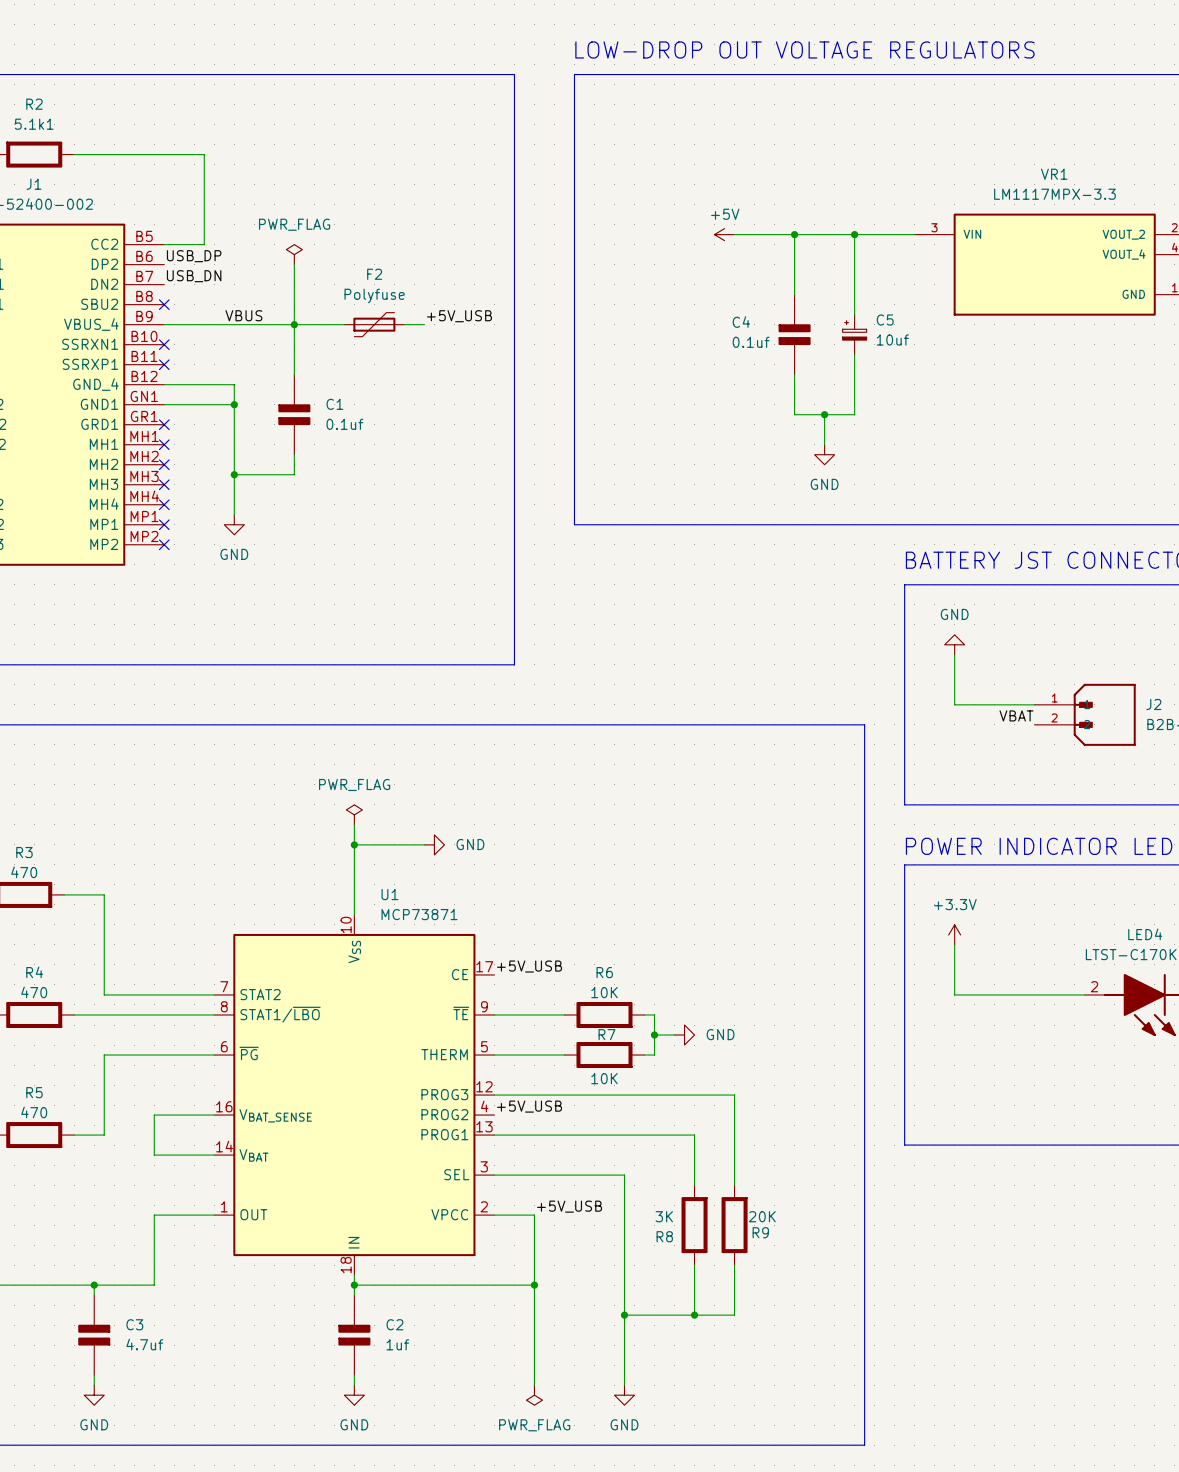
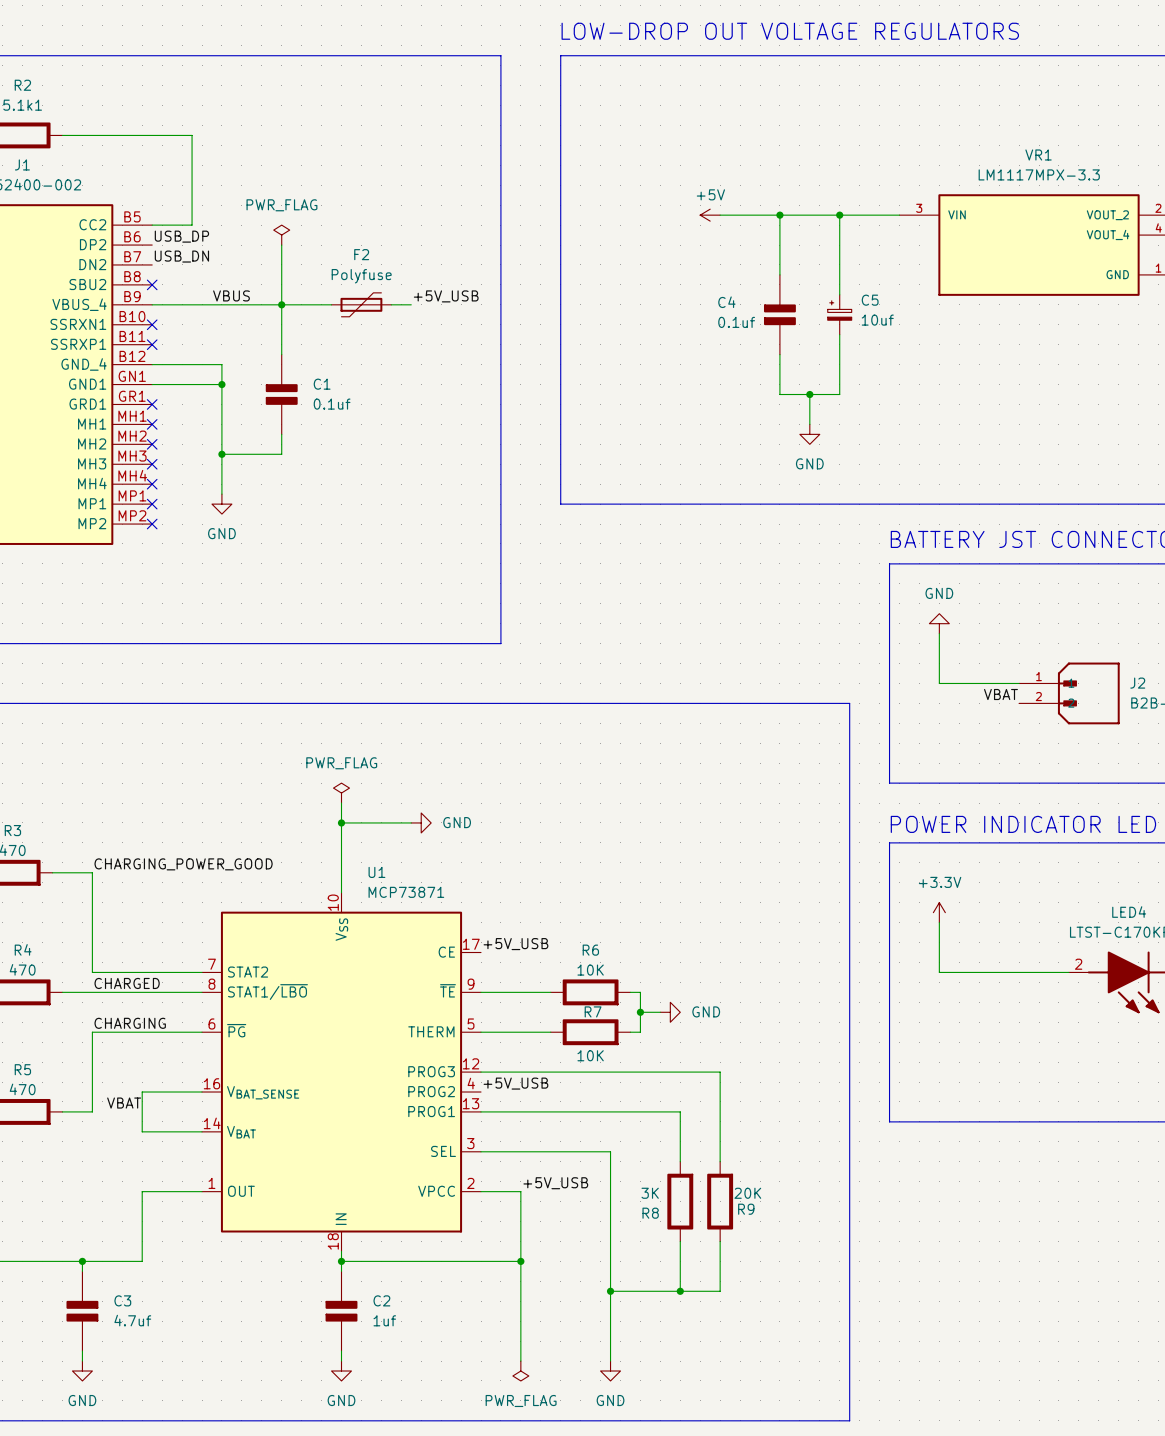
label: none -> CHARGING_POWER_GOOD (183, 864)
label: none -> CHARGED (127, 983)
label: none -> CHARGING (130, 1023)
label: none -> VBAT (124, 1103)

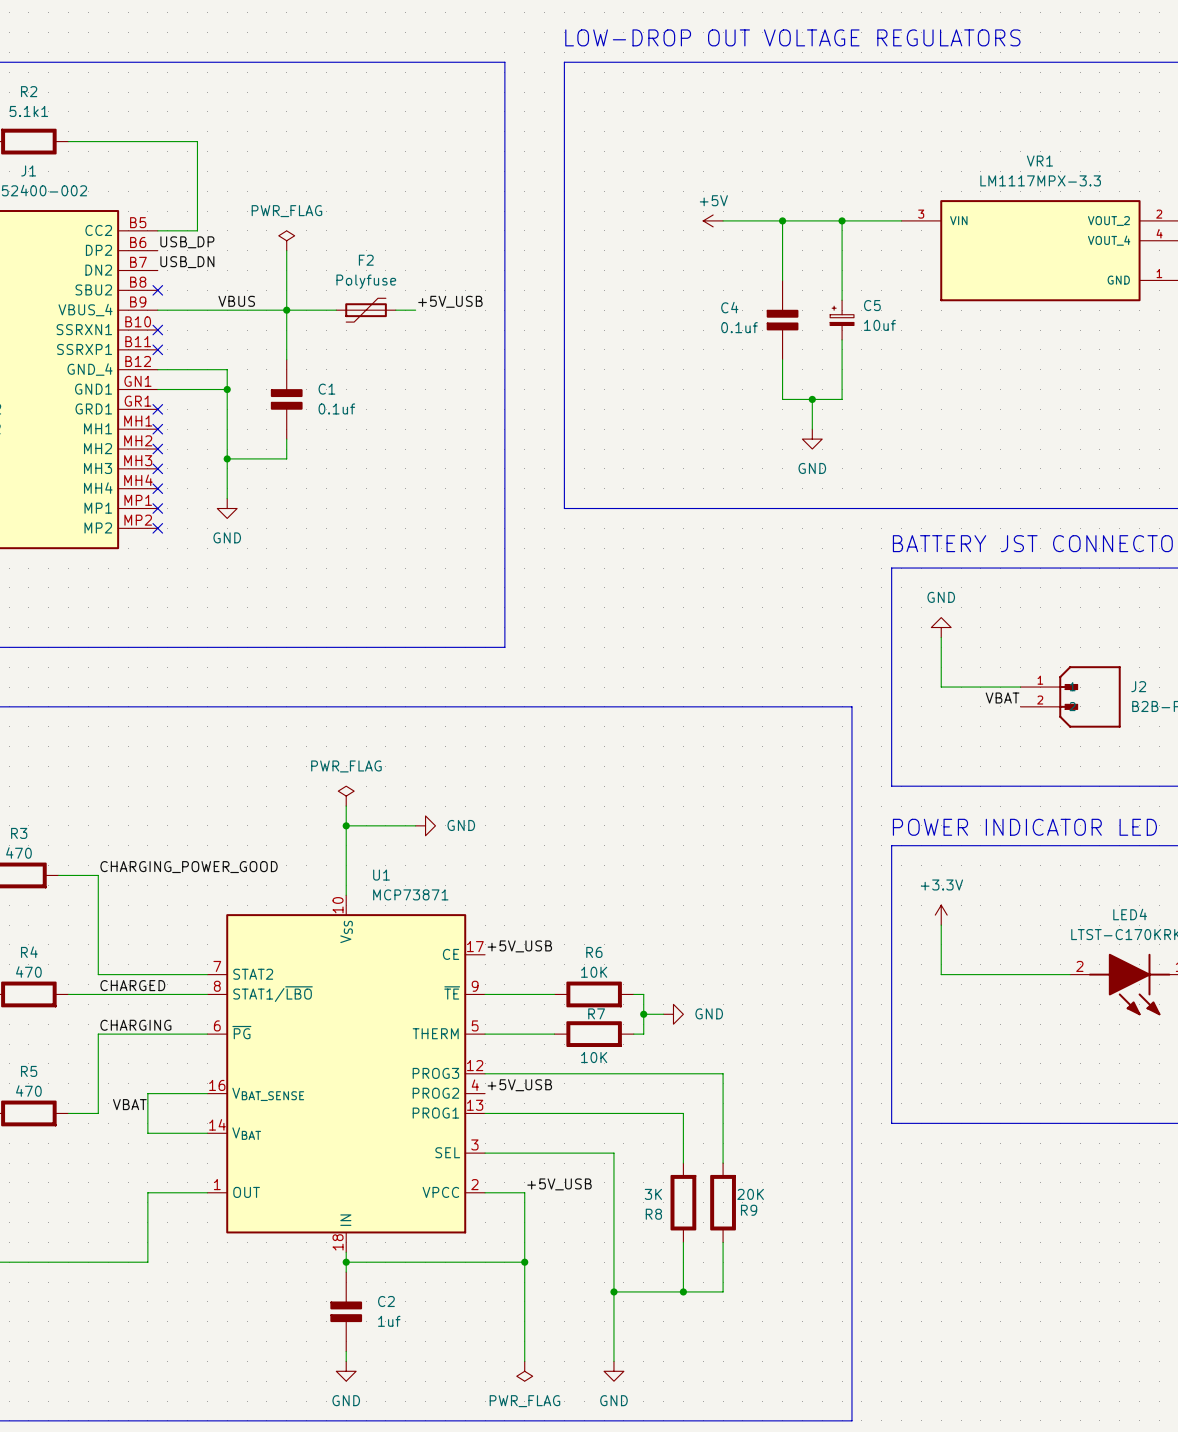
wire: (82, 1261) (82, 1271) -> none
junction: (82, 1261) -> none
C3: 4.7uf (82, 1311) -> none
wire: (82, 1351) (82, 1361) -> none
power symbol: GND (82, 1371) -> none

